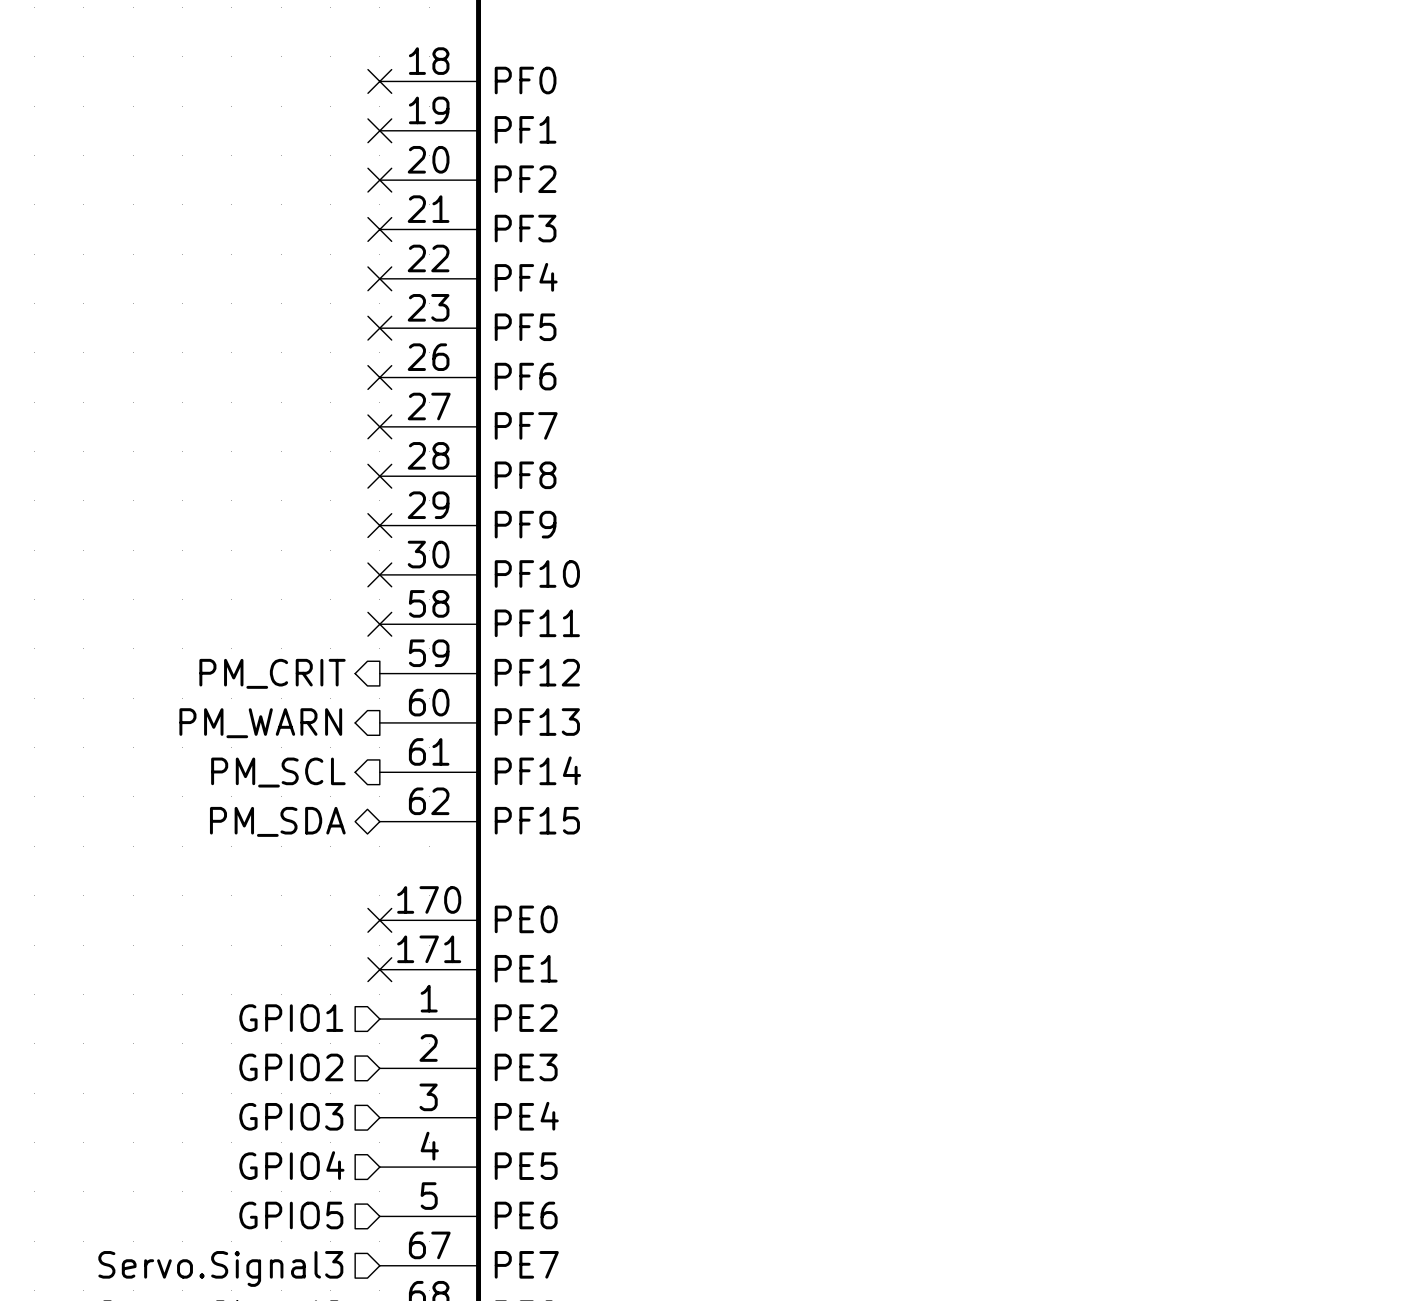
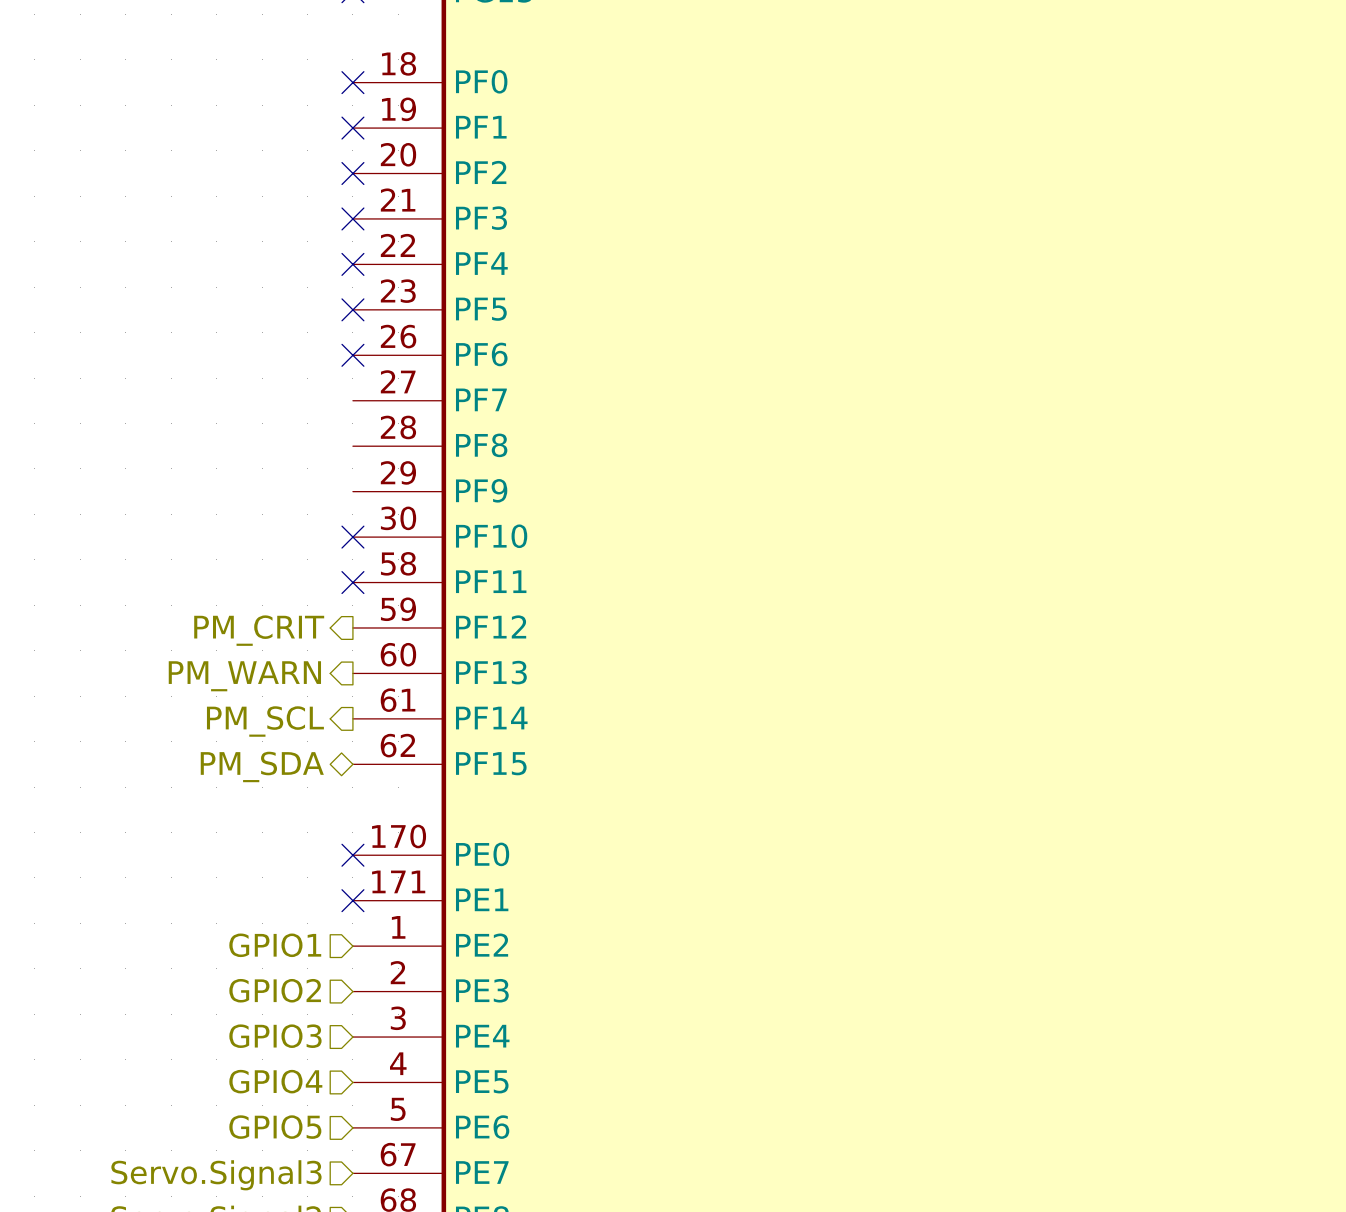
no-connect mark: (379, 426) -> none
no-connect mark: (379, 476) -> none
no-connect mark: (379, 525) -> none

